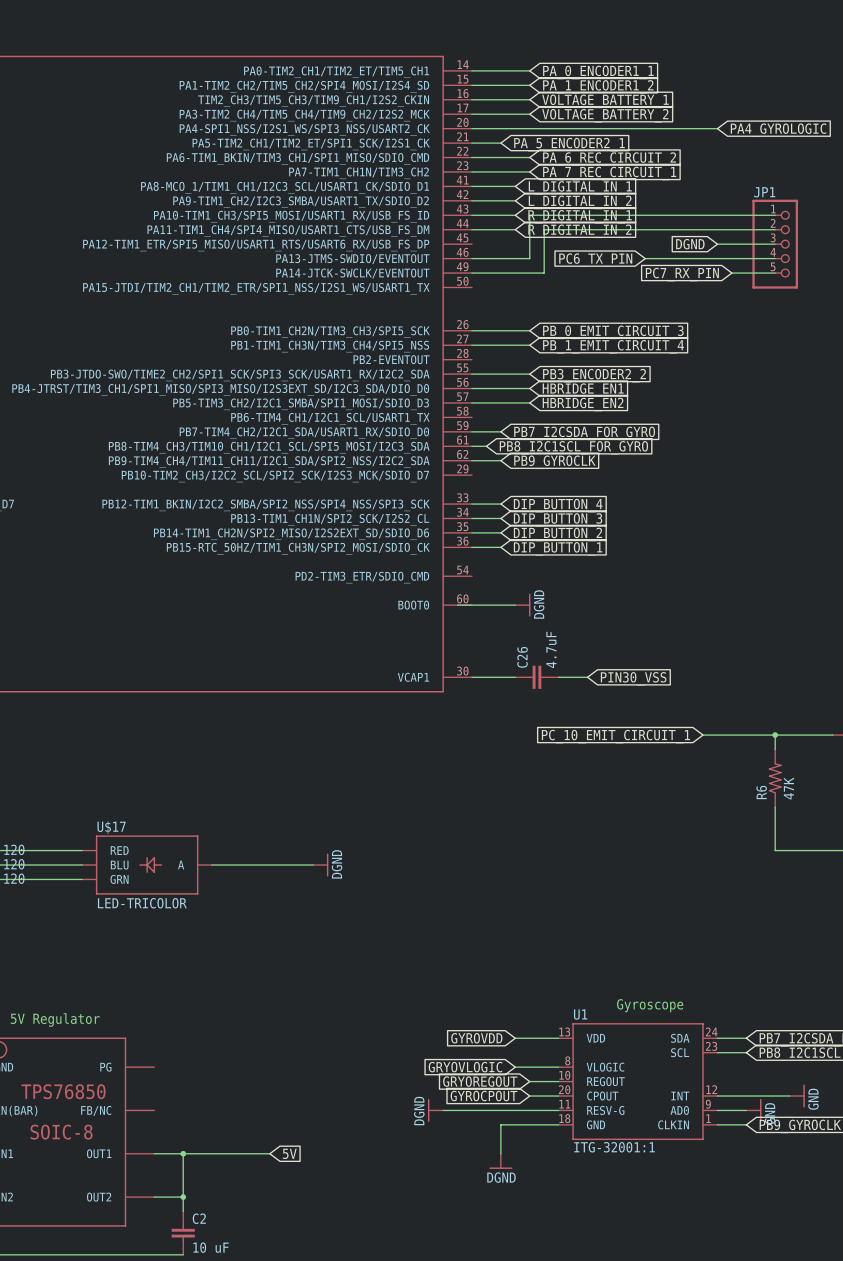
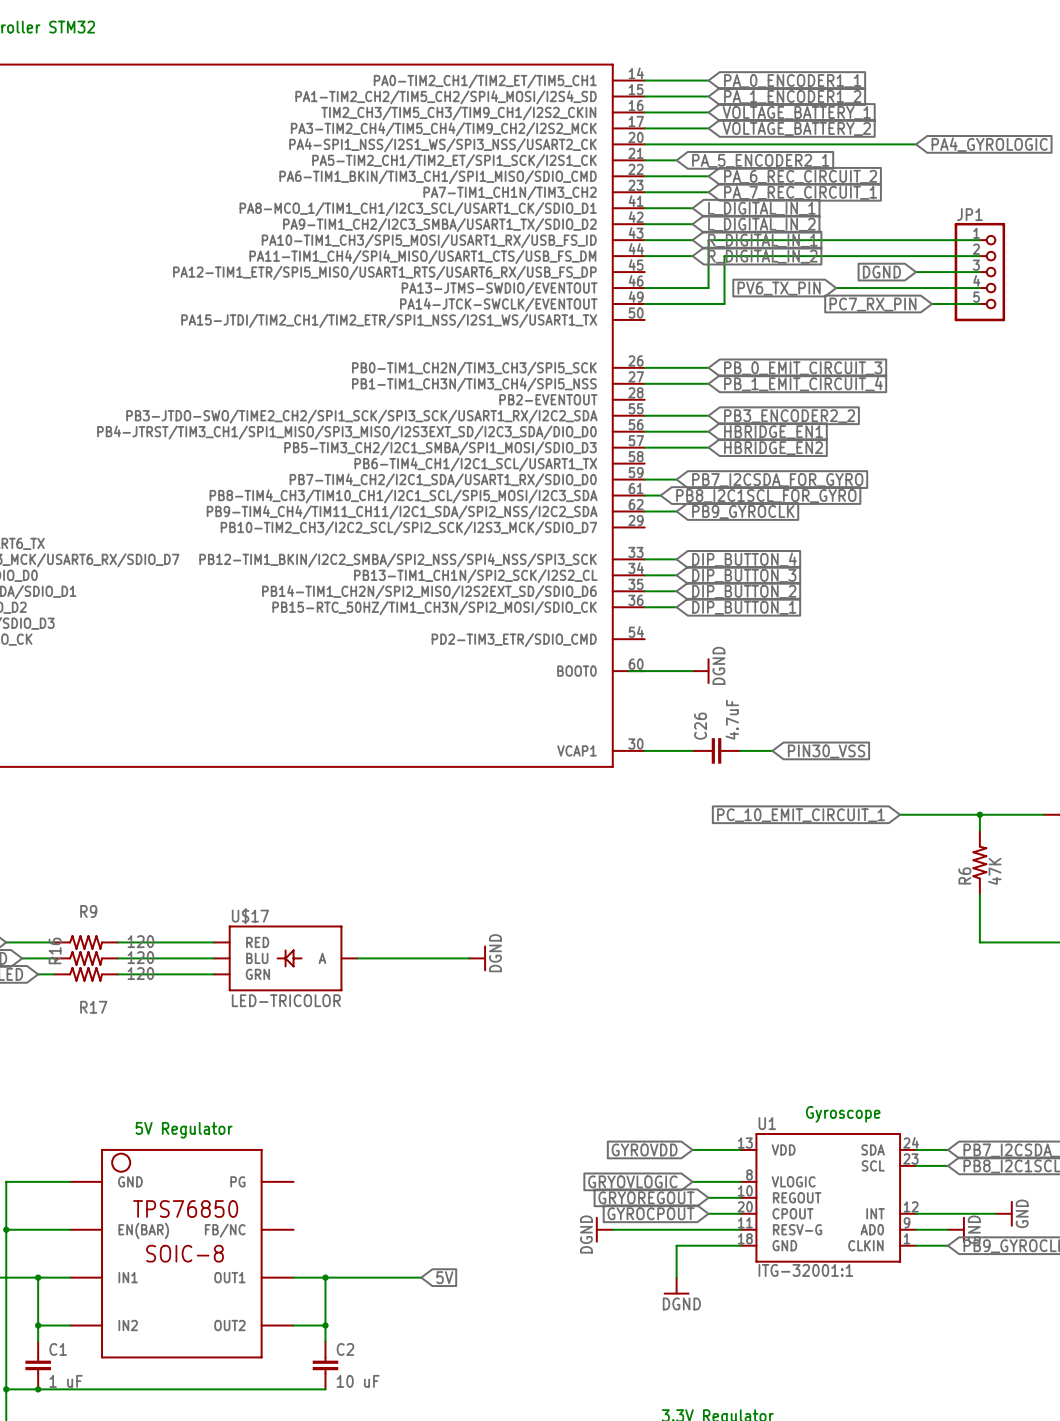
global label: PC6_TX_PIN (595, 260) -> PV6_TX_PIN (779, 288)

